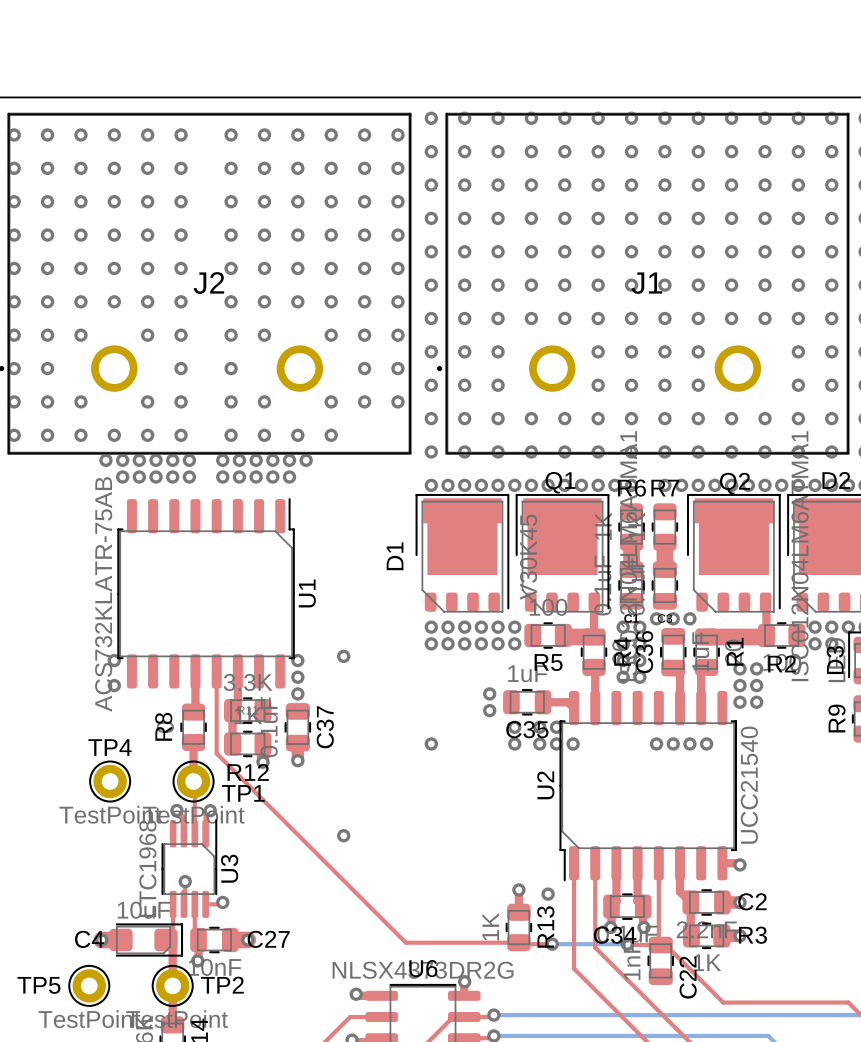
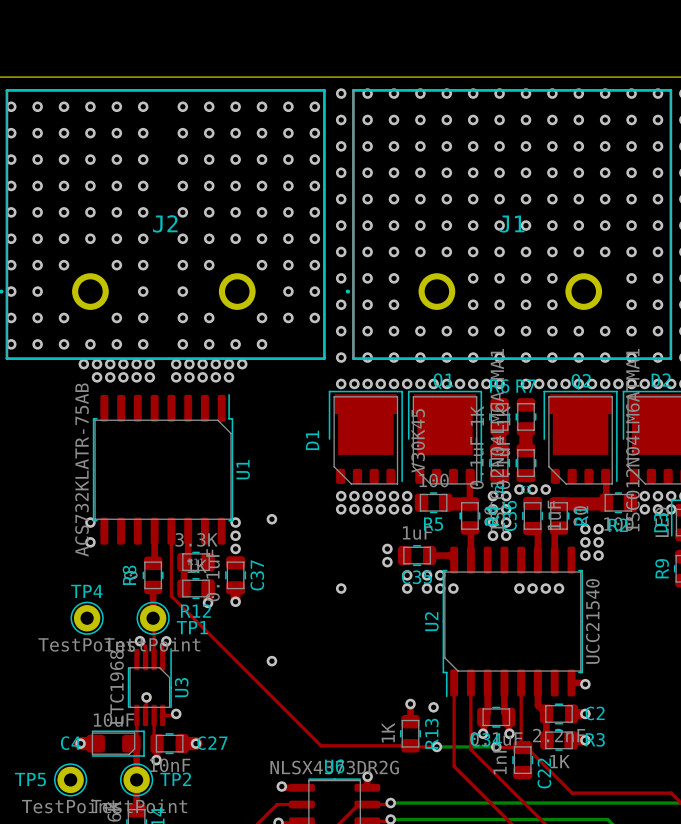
via: none -> (671, 509)

